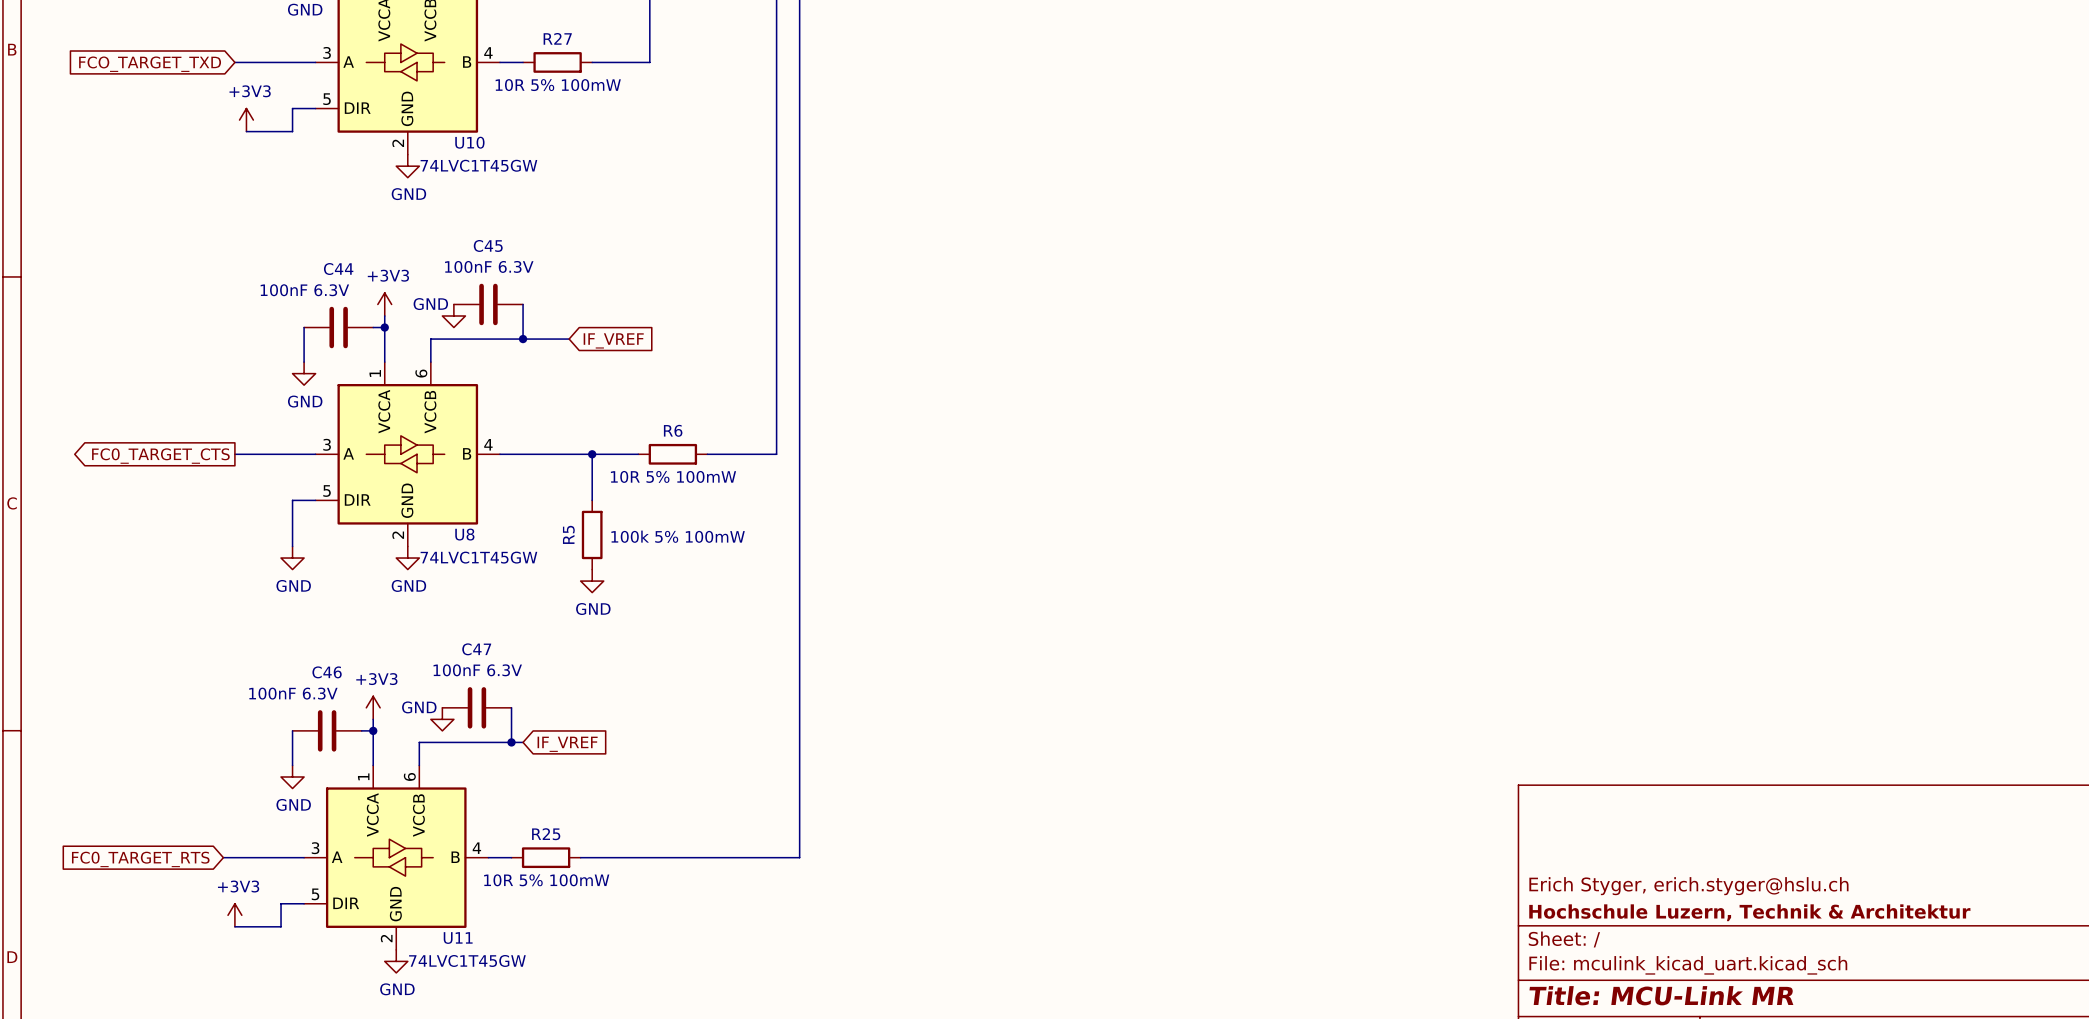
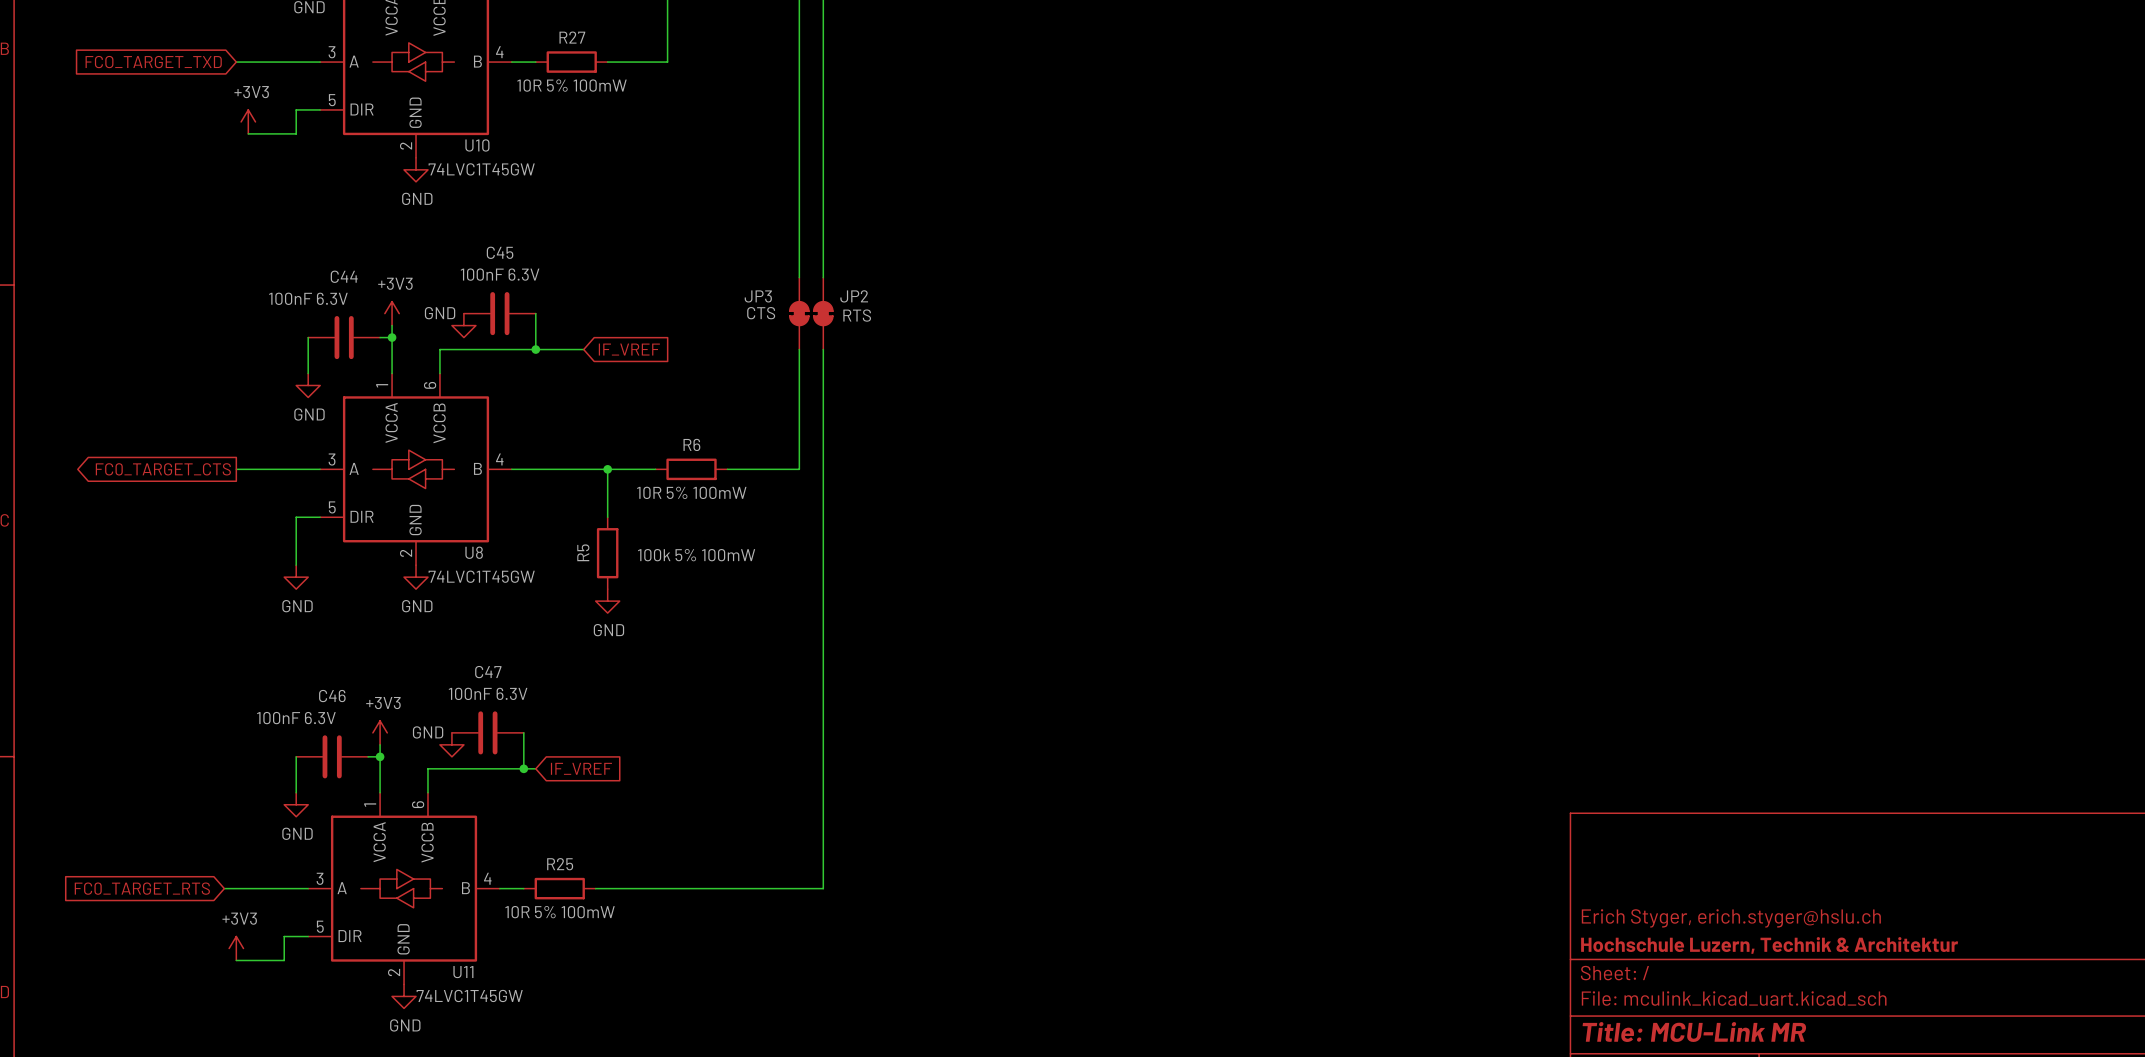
JP3: none -> CTS (799, 313)
JP2: none -> RTS (823, 313)

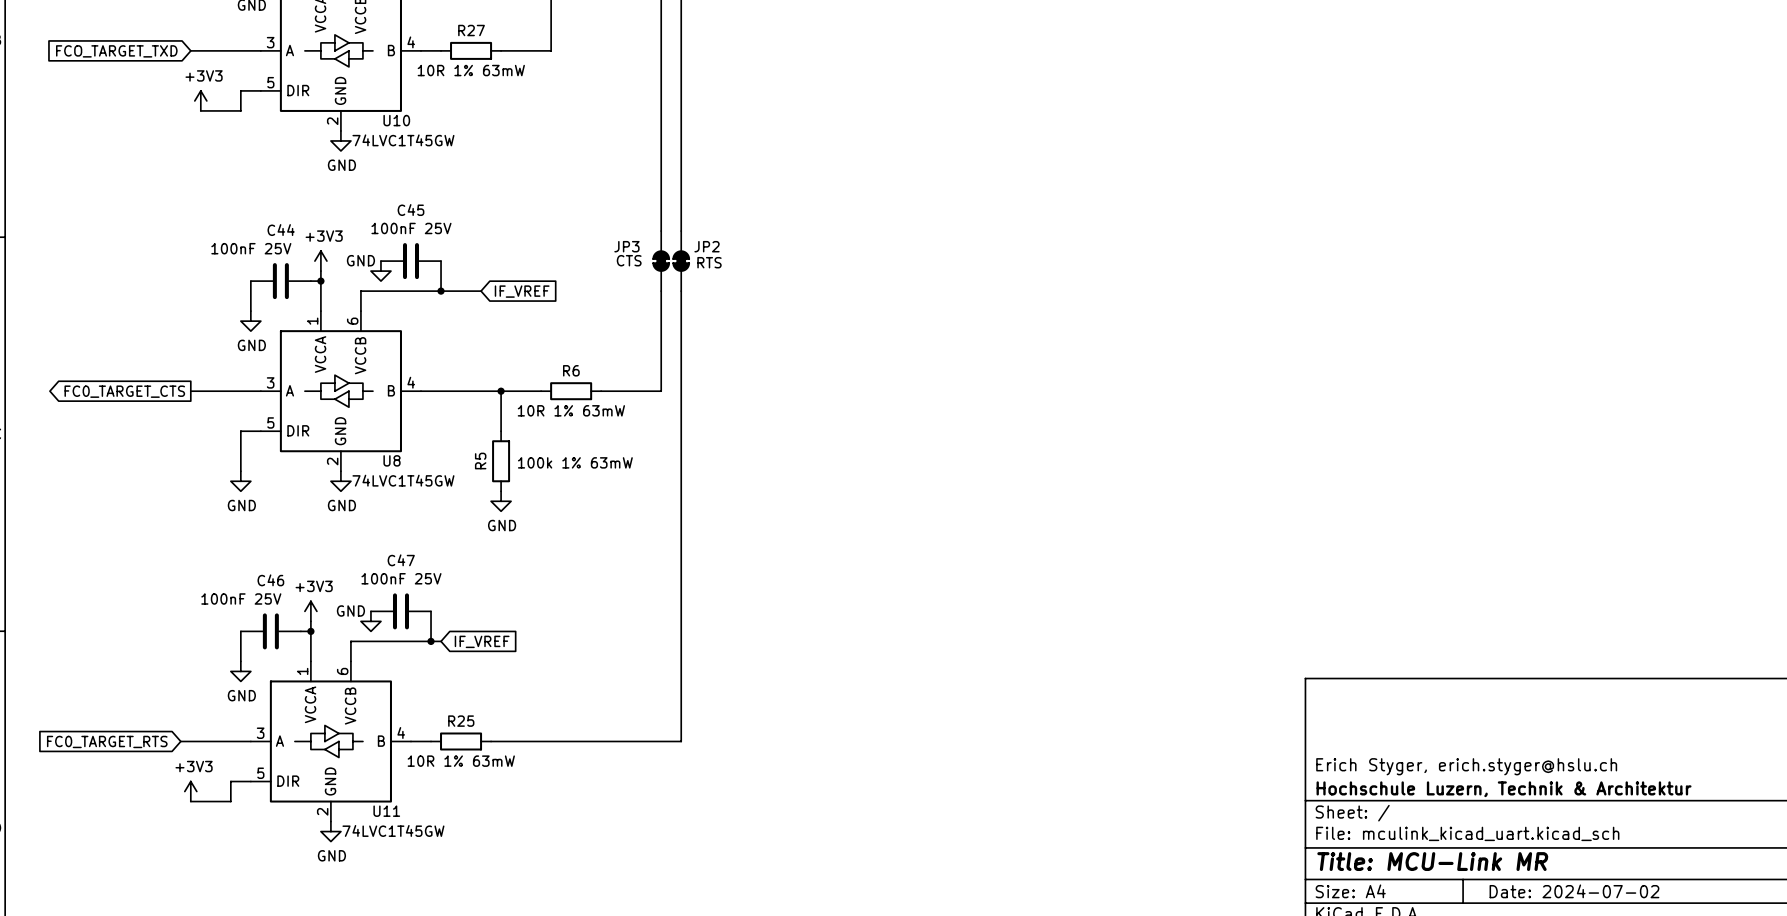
R27 value: 10R 5% 100mW (572, 85) -> 10R 1% 63mW (471, 70)
C45 value: 100nF 6.3V (500, 274) -> 100nF 25V (411, 228)
C44 value: 100nF 6.3V (308, 298) -> 100nF 25V (251, 248)
R6 value: 10R 5% 100mW (691, 492) -> 10R 1% 63mW (571, 410)
R5 value: 100k 5% 100mW (696, 555) -> 100k 1% 63mW (575, 462)
C47 value: 100nF 6.3V (488, 693) -> 100nF 25V (401, 578)
C46 value: 100nF 6.3V (296, 718) -> 100nF 25V (241, 598)
R25 value: 10R 5% 100mW (560, 912) -> 10R 1% 63mW (461, 761)

